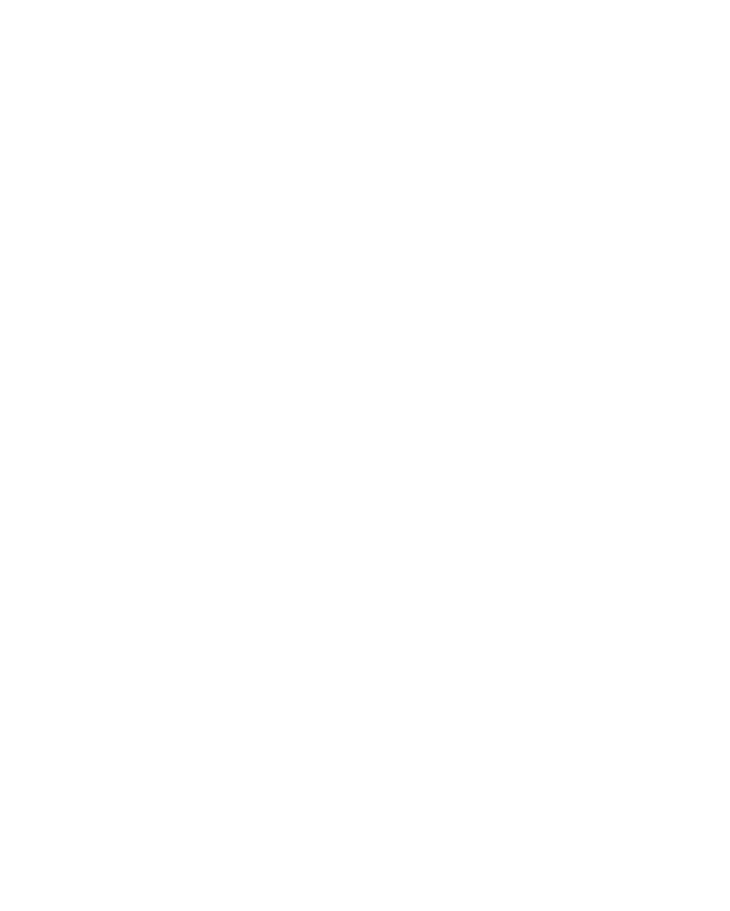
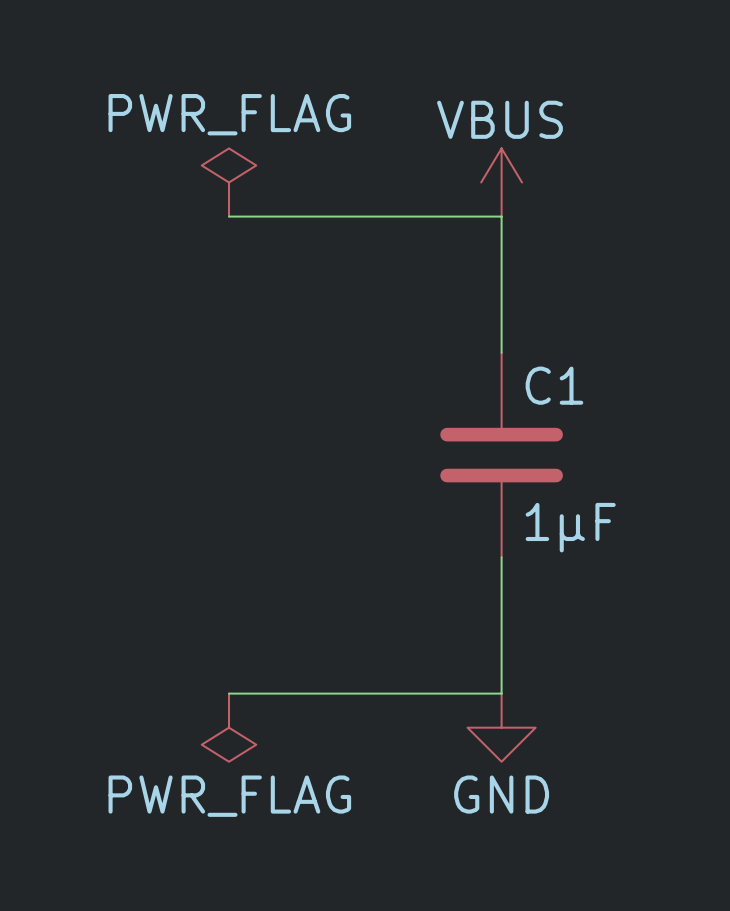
power symbol: none -> PWR_FLAG (229, 182)
power symbol: none -> VBUS (501, 182)
wire: none -> (229, 216) (501, 216) (501, 352)
C1: none -> 1µF (501, 455)
wire: none -> (501, 557) (501, 693) (229, 693)
power symbol: none -> PWR_FLAG (229, 727)
power symbol: none -> GND (501, 727)

